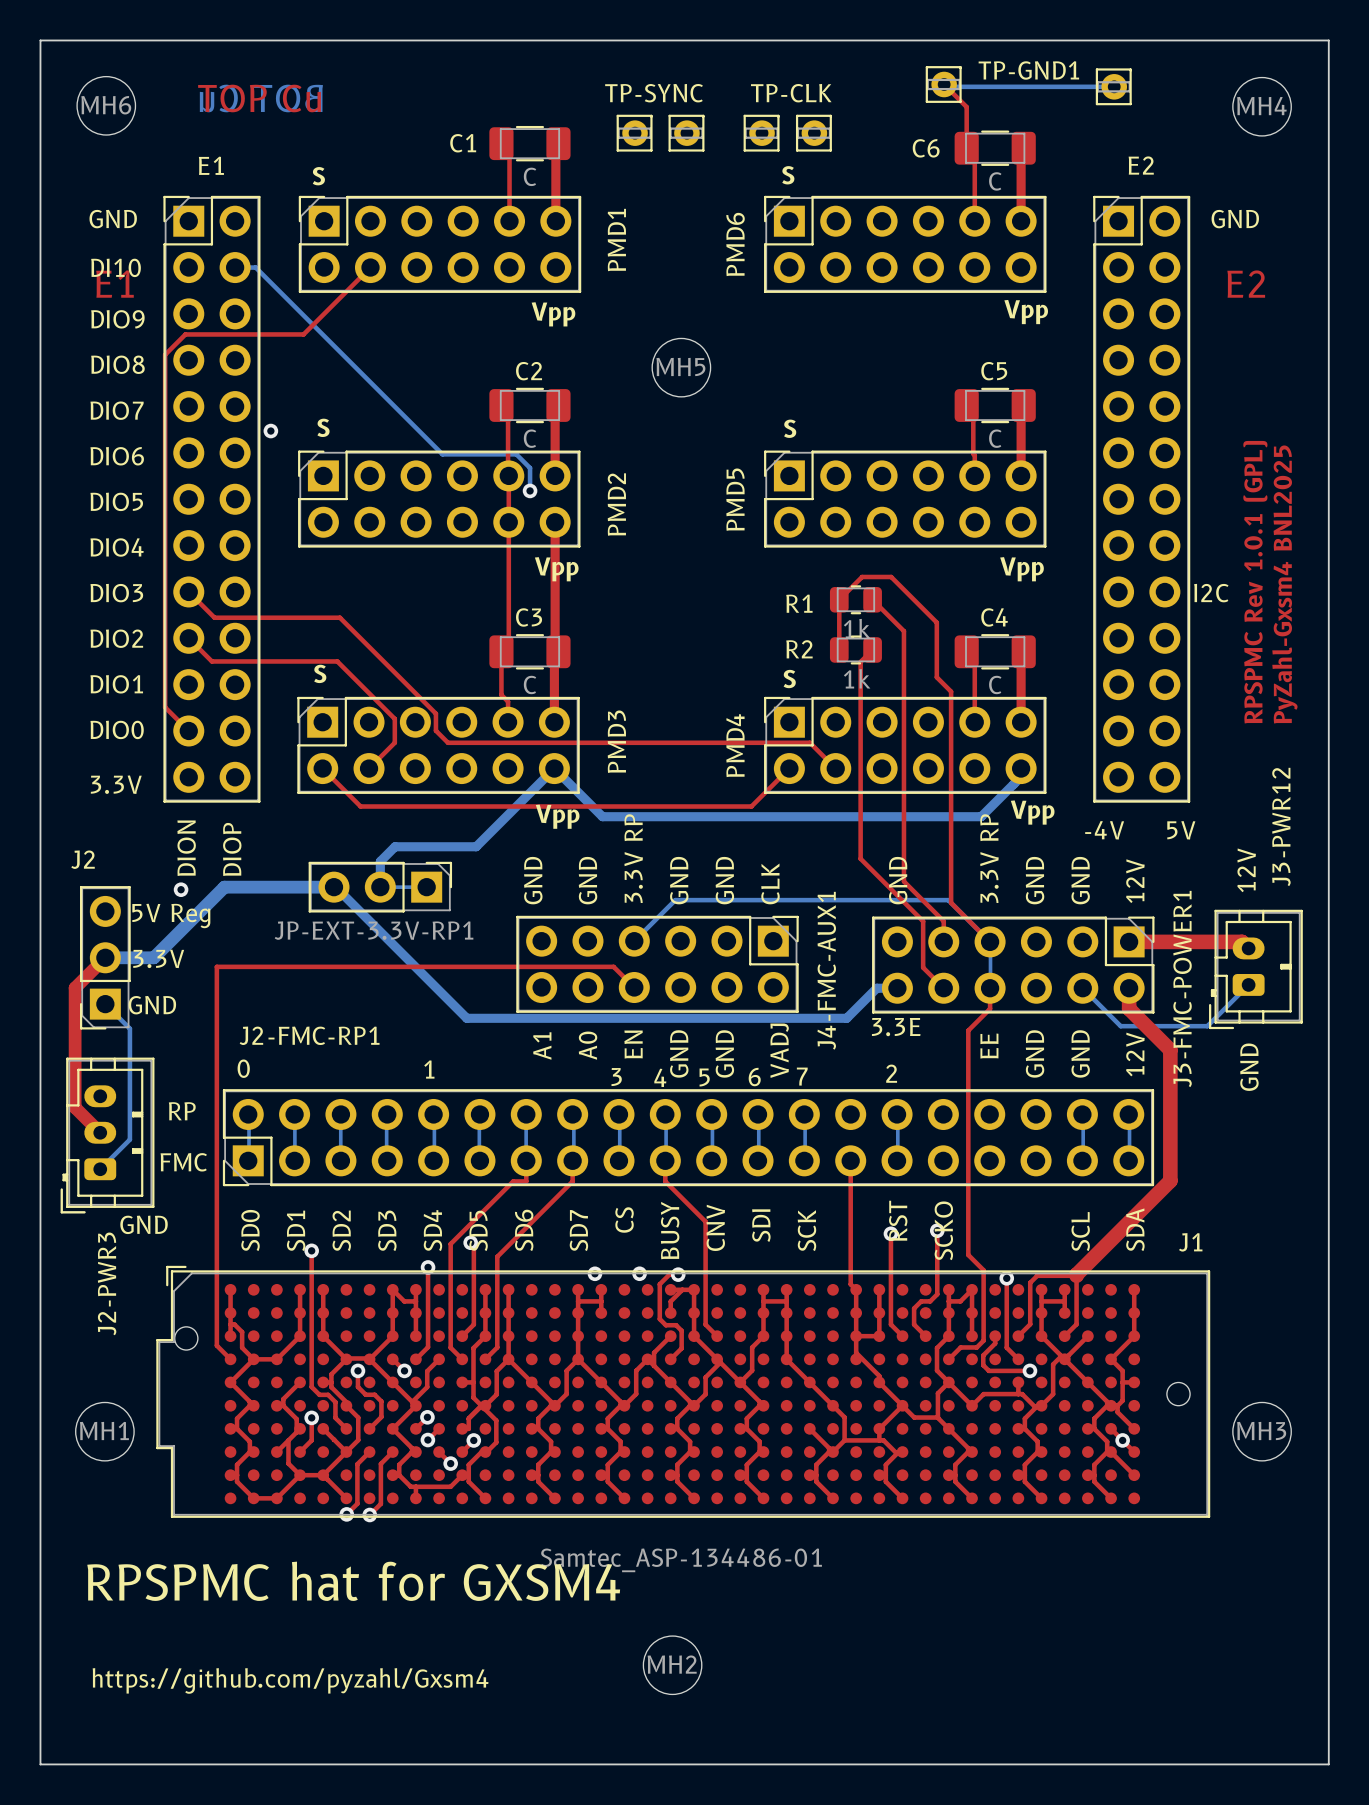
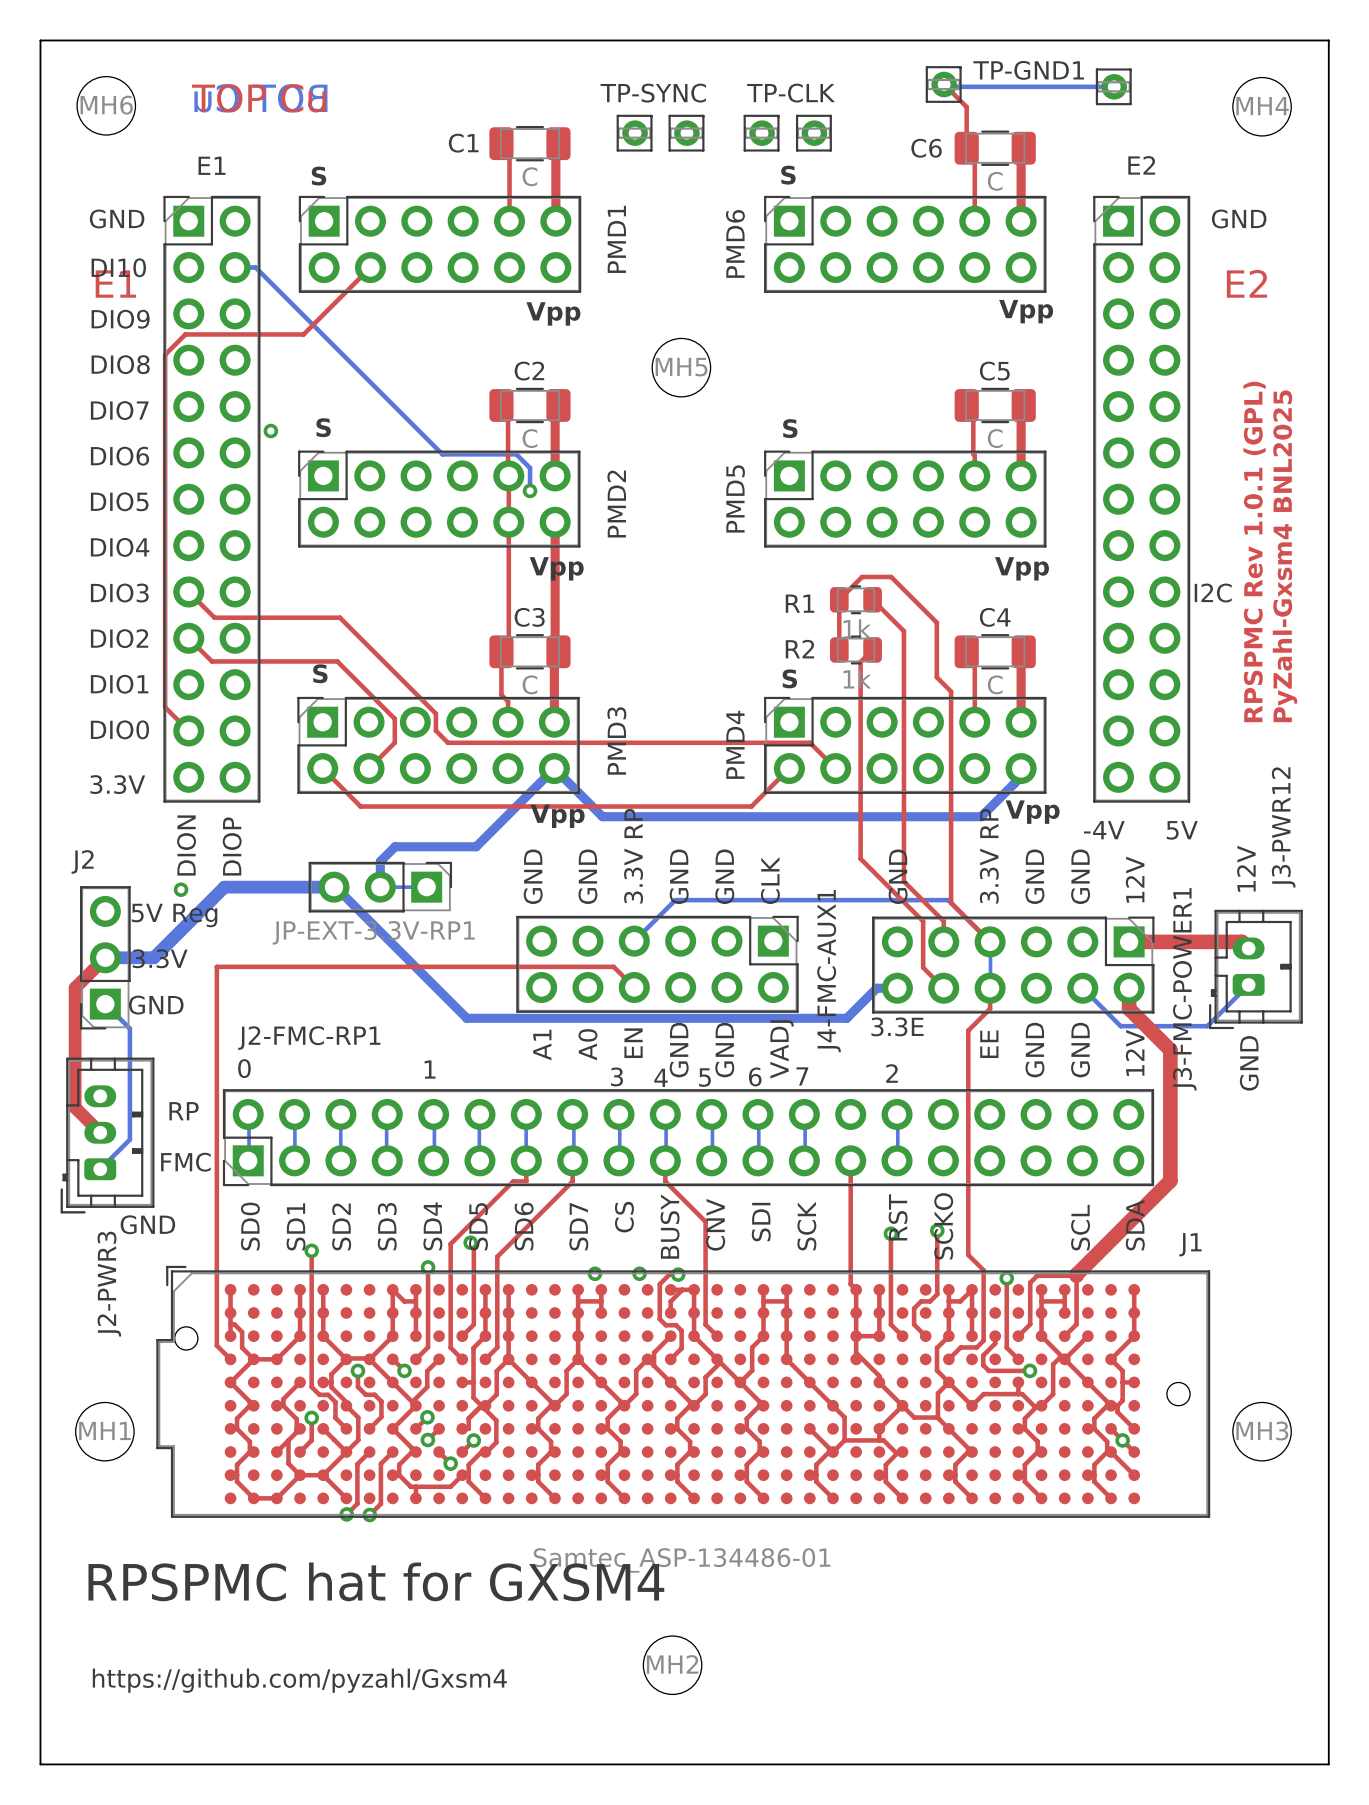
bottom track: (1083, 1124) (1083, 1148) -> none
bottom track: (1129, 1124) (1129, 1148) -> none

